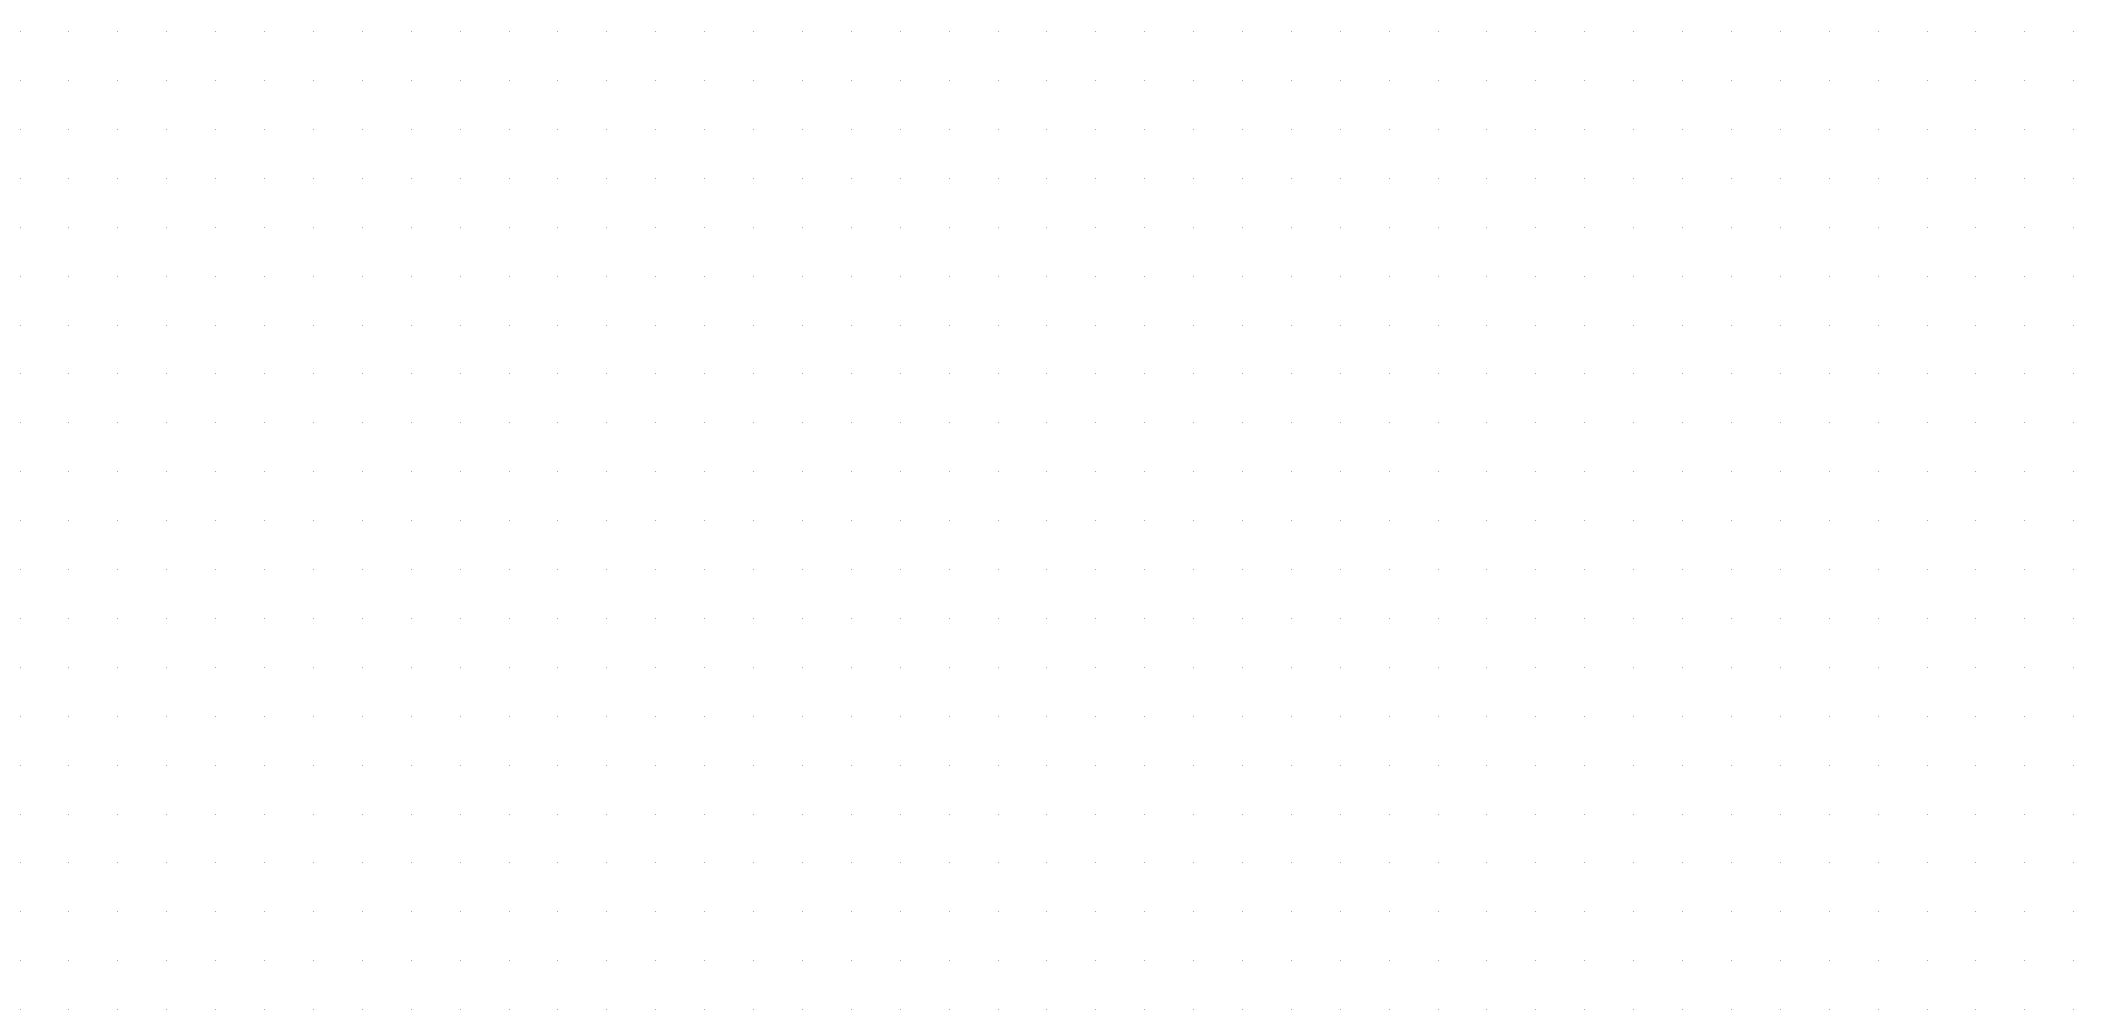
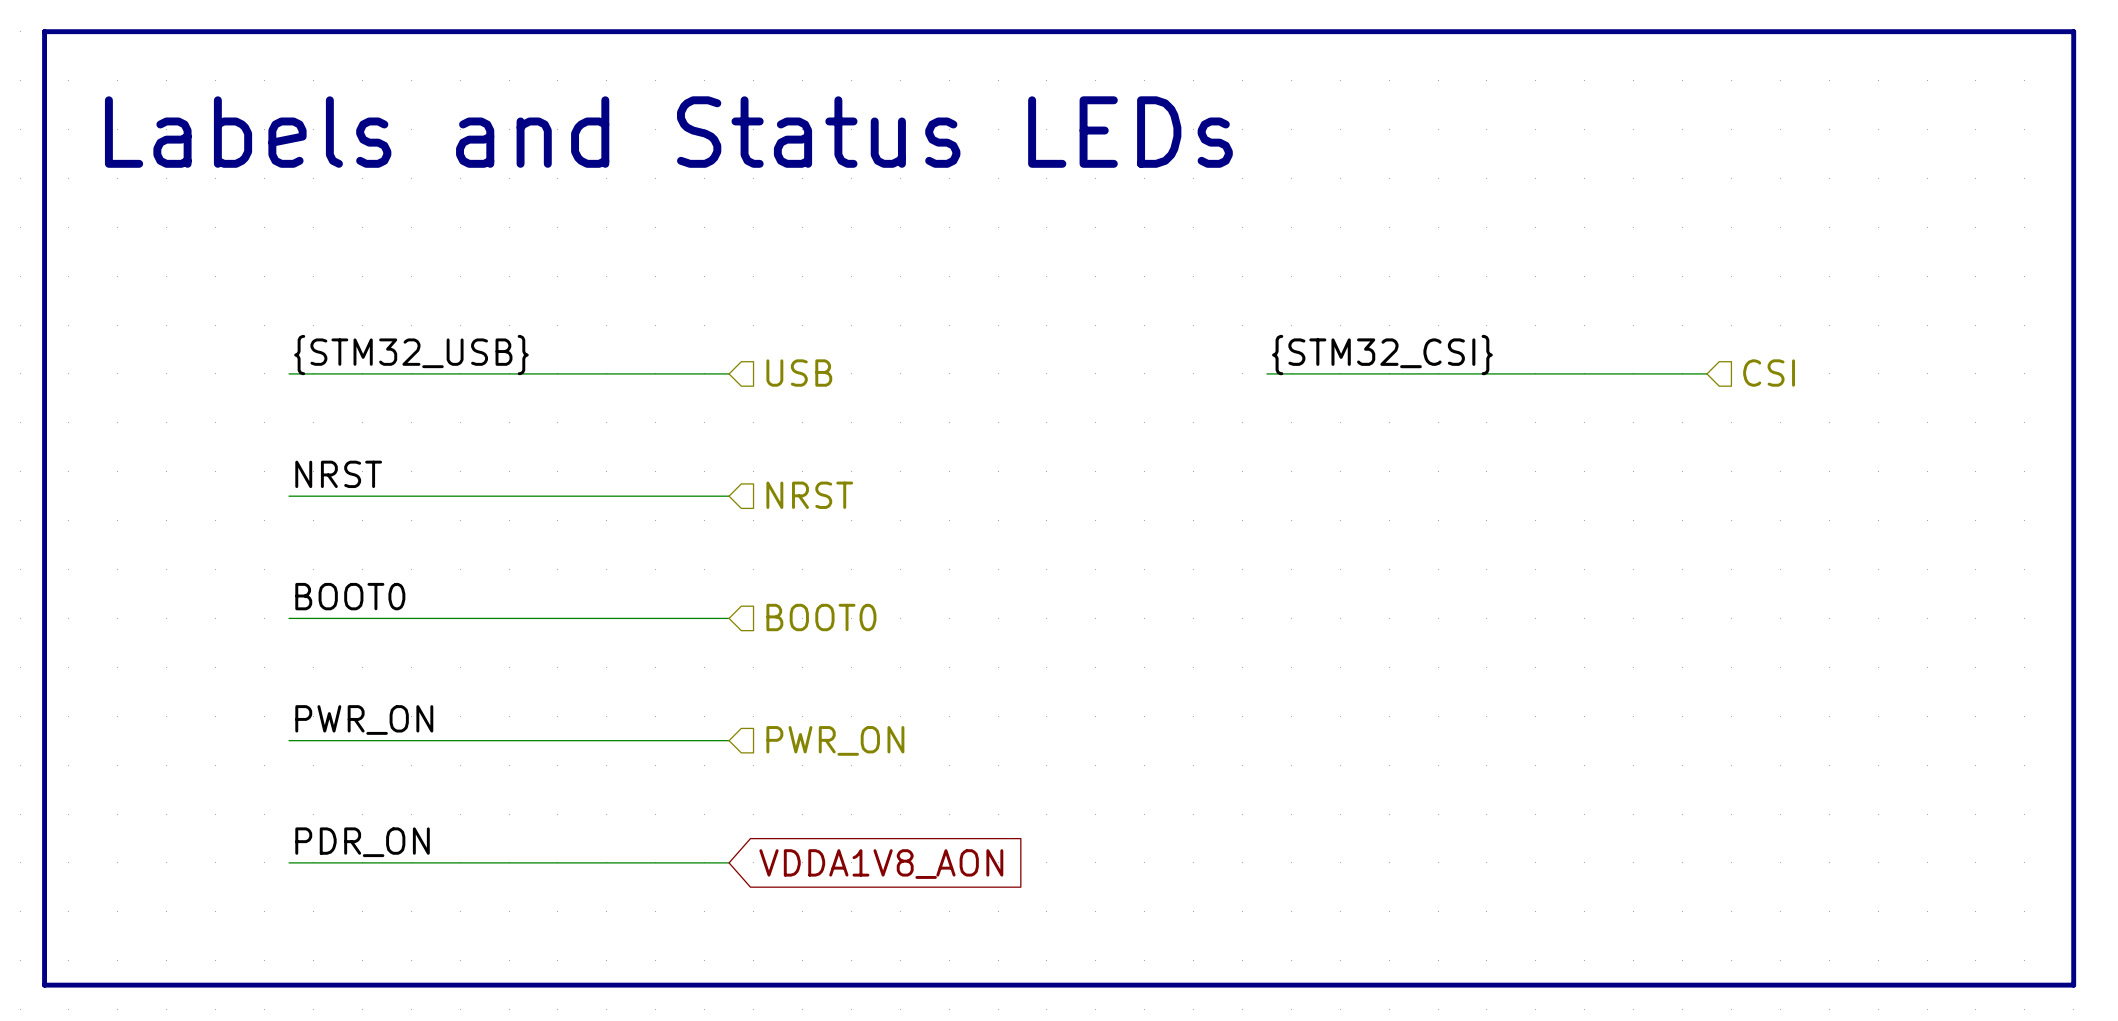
line: none -> (44, 31) (2073, 31) (2073, 985) (44, 985) (44, 31)
text: none -> Labels and Status LEDs (668, 132)
label: none -> {STM32_USB} (411, 355)
label: none -> {STM32_CSI} (1382, 355)
wire: none -> (289, 373) (729, 373)
hierarchical label: none -> USB (799, 373)
wire: none -> (1266, 373) (1706, 373)
hierarchical label: none -> CSI (1769, 373)
label: none -> NRST (338, 474)
hierarchical label: none -> NRST (809, 495)
wire: none -> (289, 496) (729, 496)
label: none -> BOOT0 (350, 596)
hierarchical label: none -> BOOT0 (821, 617)
wire: none -> (289, 618) (729, 618)
label: none -> PWR_ON (364, 720)
wire: none -> (289, 740) (729, 740)
hierarchical label: none -> PWR_ON (835, 740)
label: none -> PDR_ON (362, 842)
wire: none -> (289, 862) (729, 862)
global label: none -> VDDA1V8_AON (881, 864)

